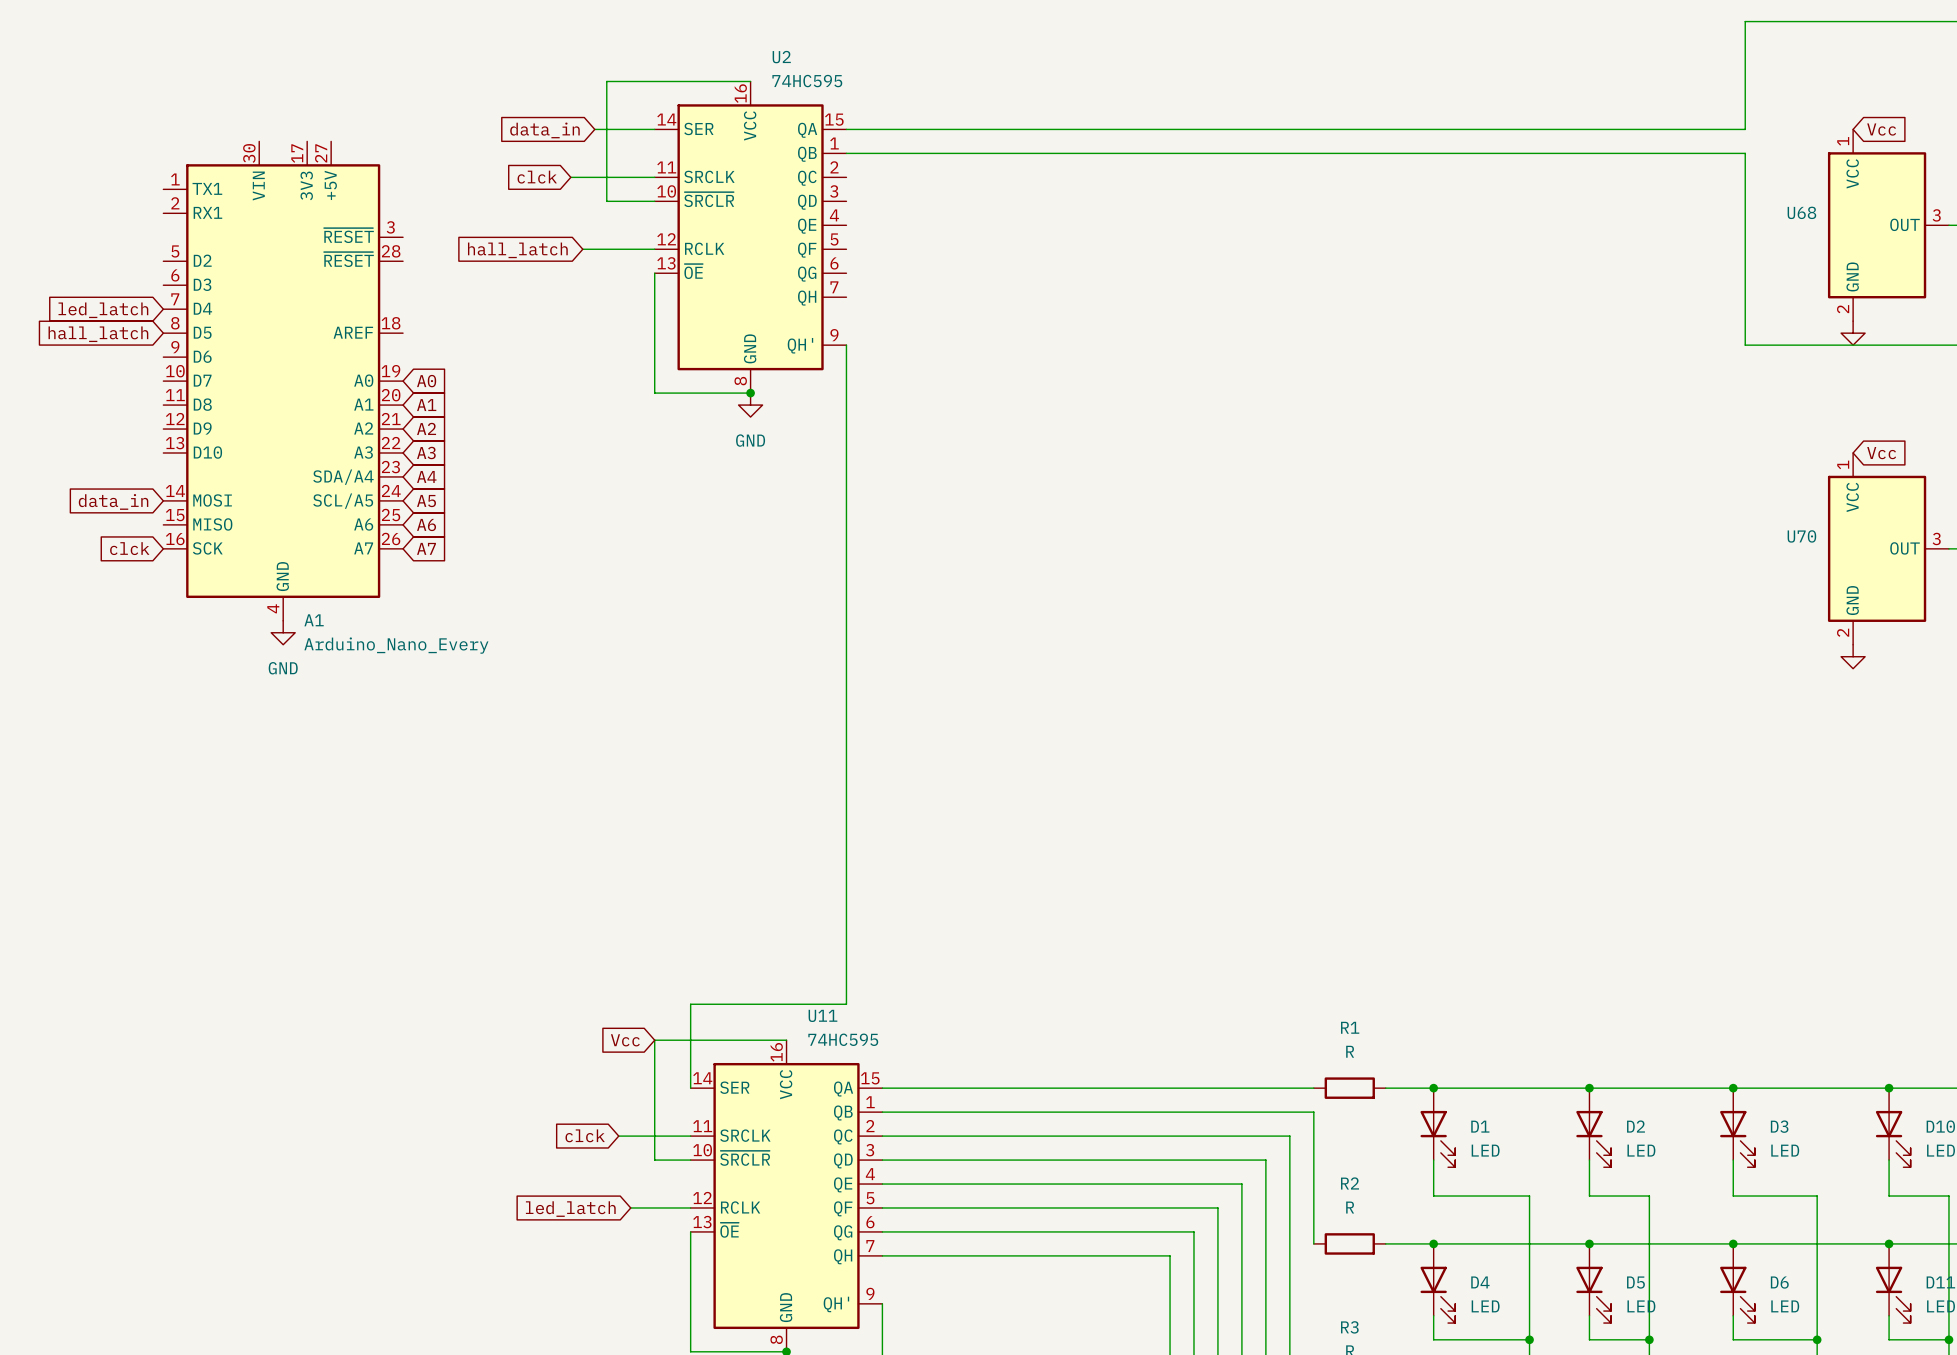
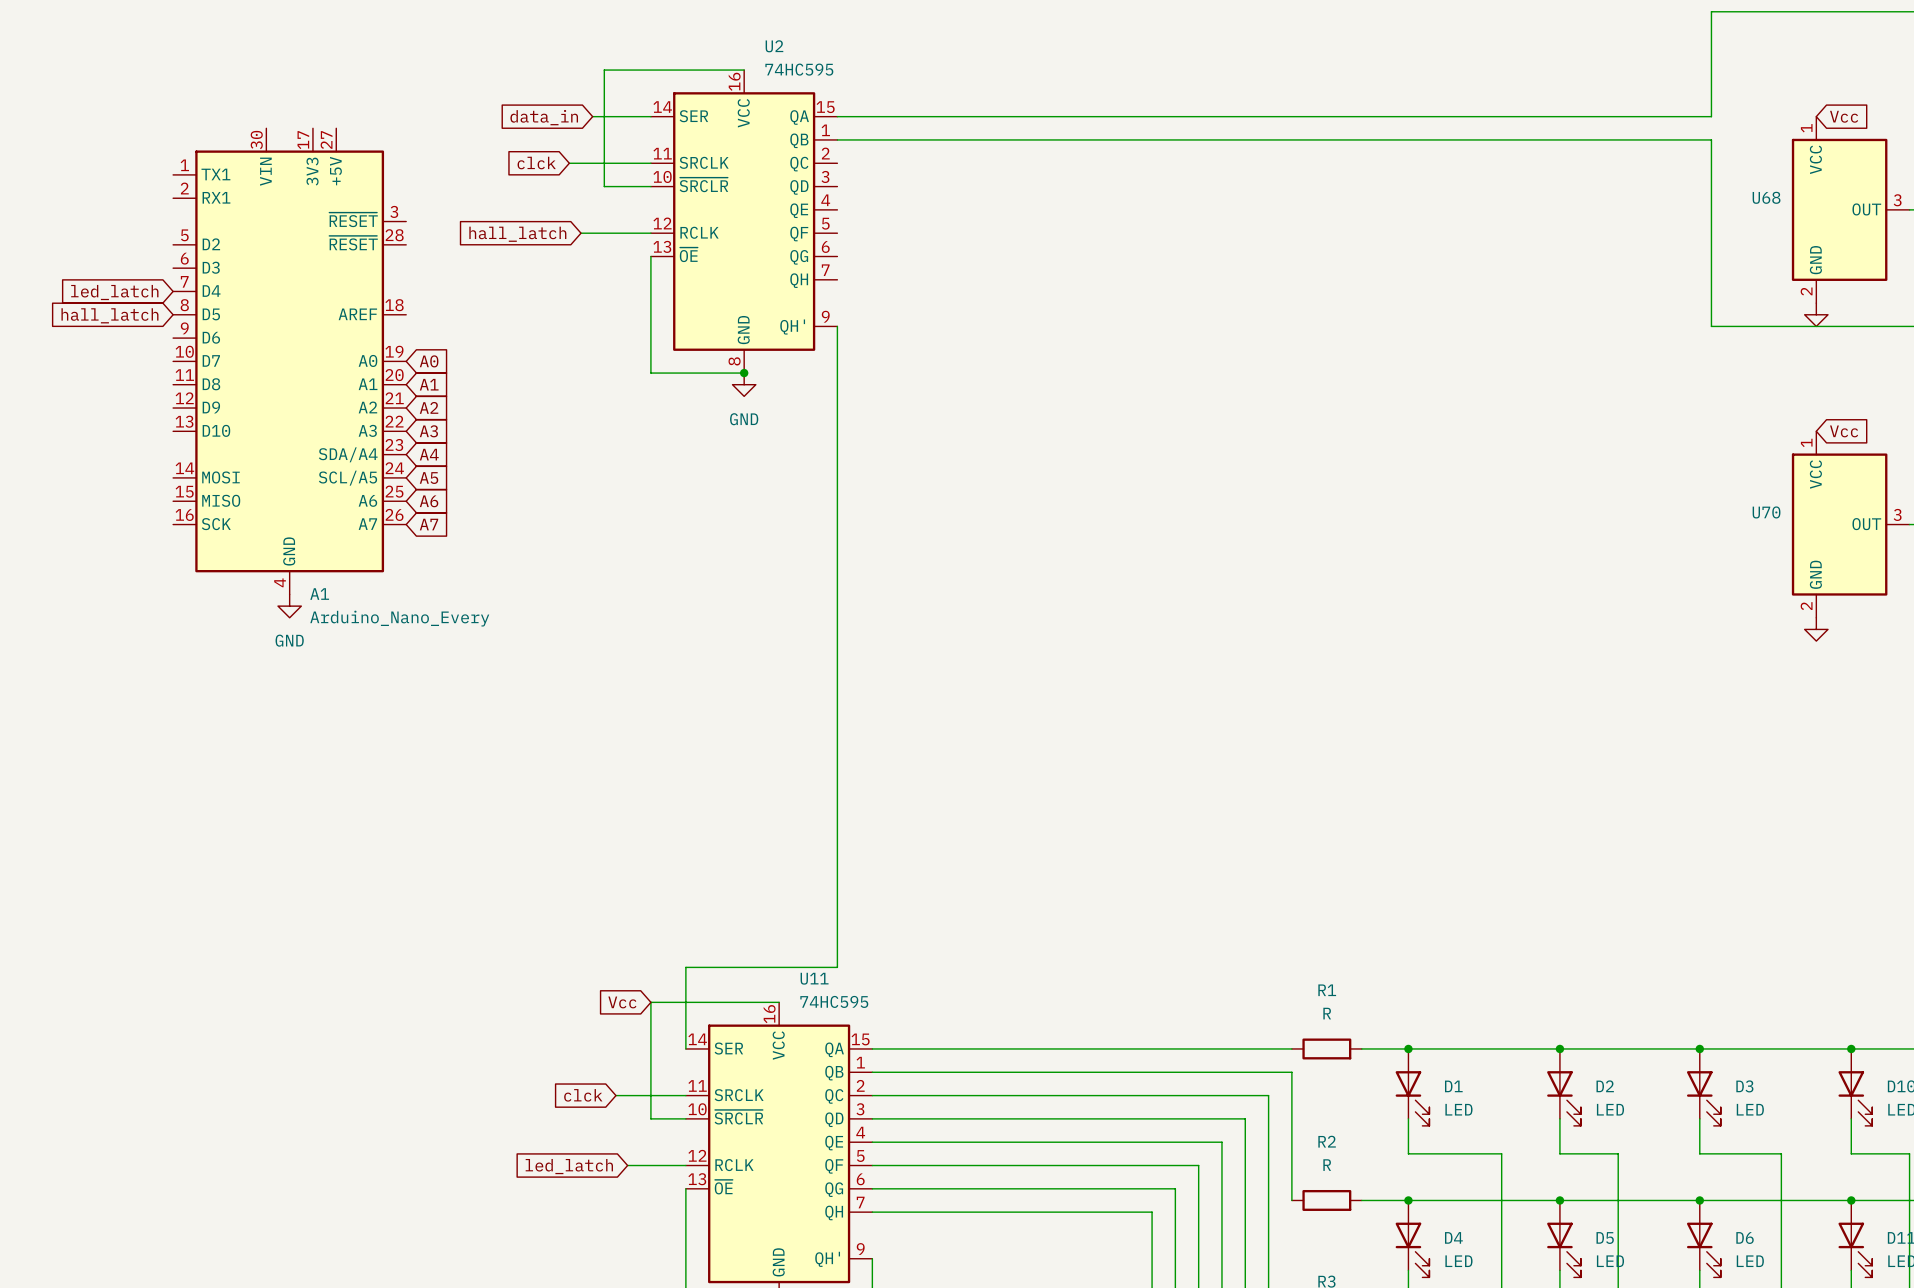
global label: data_in (113, 501) -> none
global label: clck (129, 548) -> none

